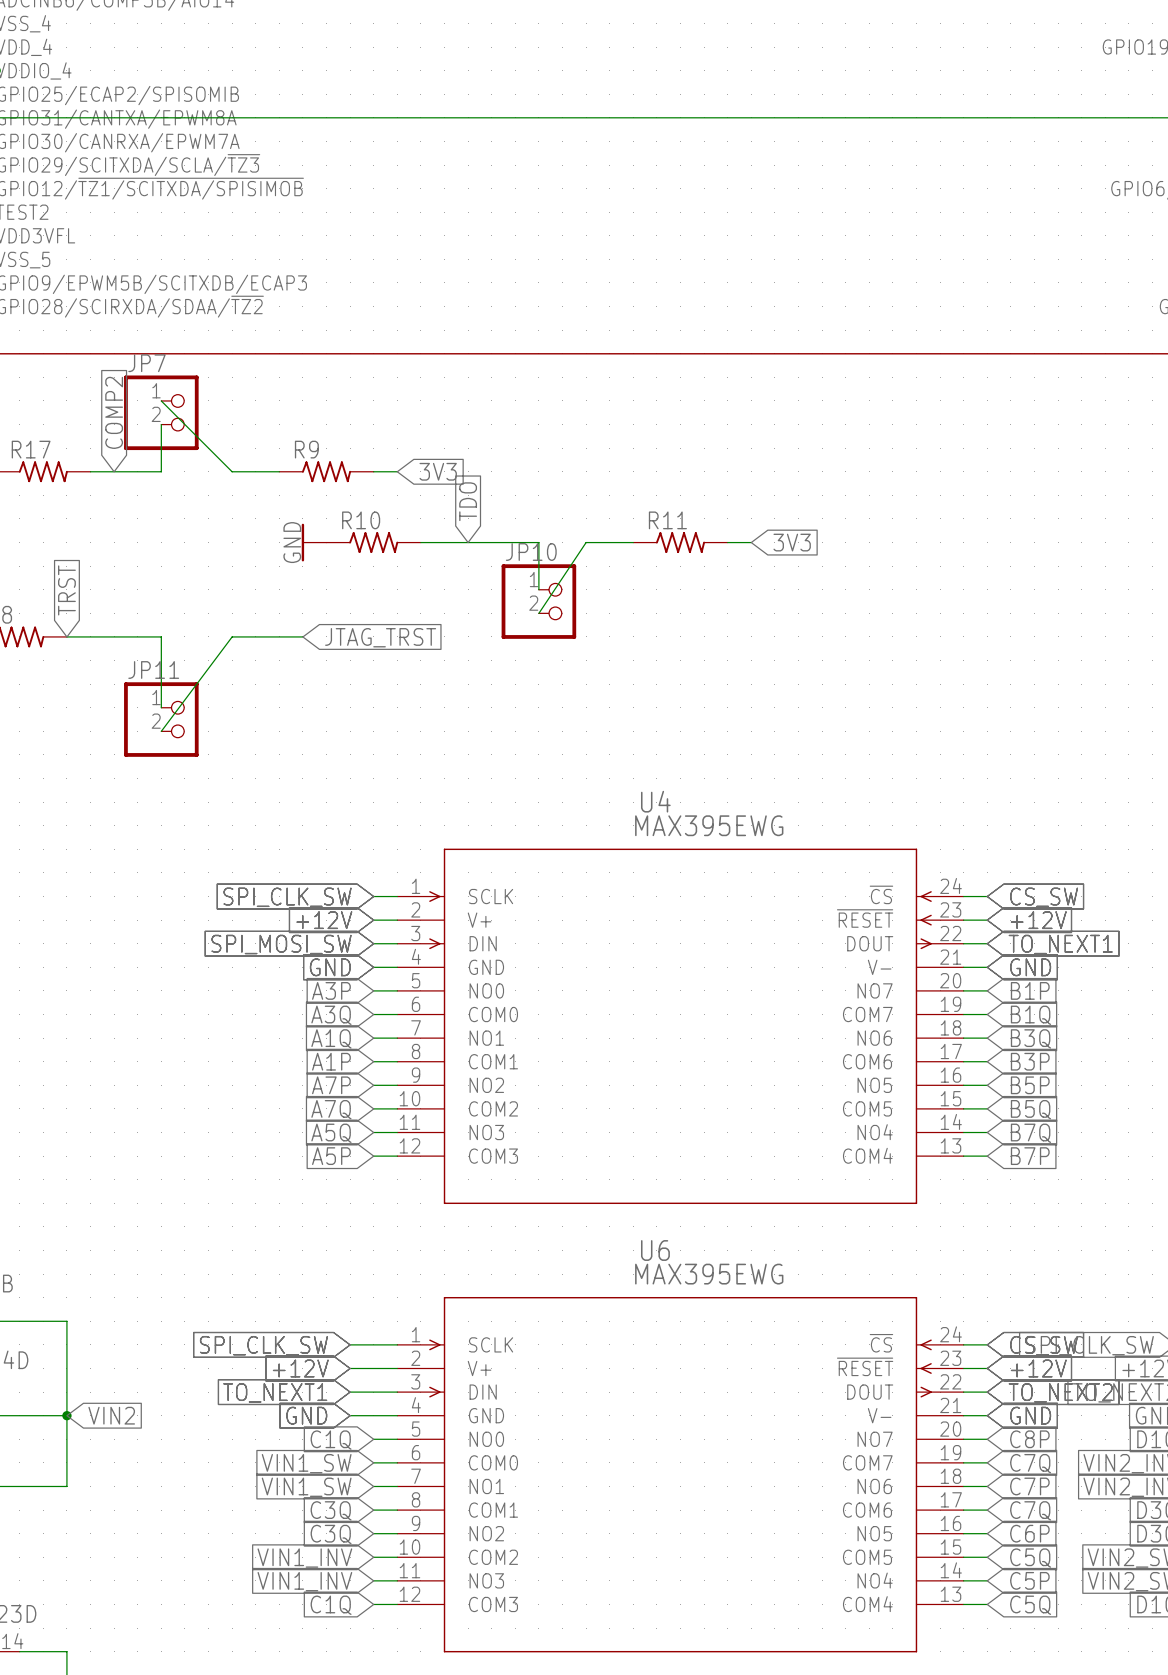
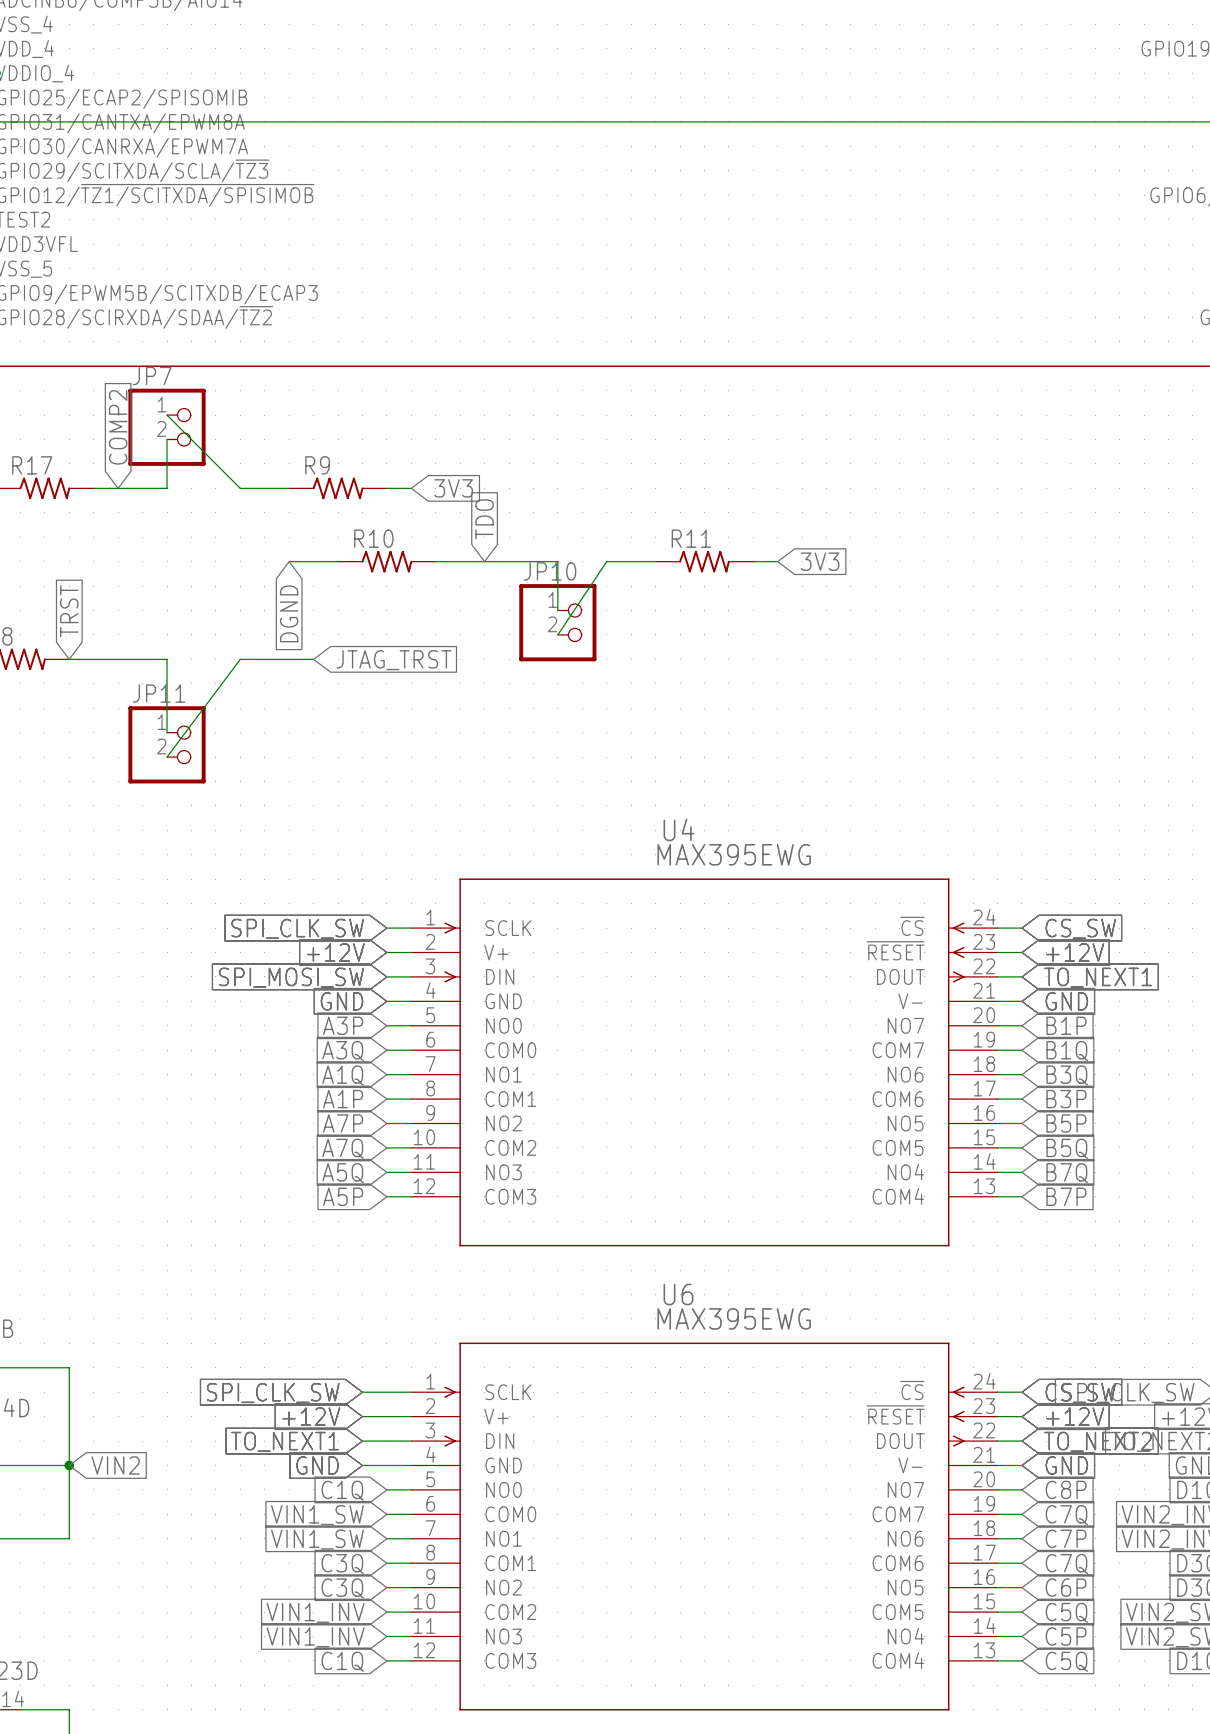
power symbol: GND (314, 542) -> none
global label: none -> DGND (289, 613)

